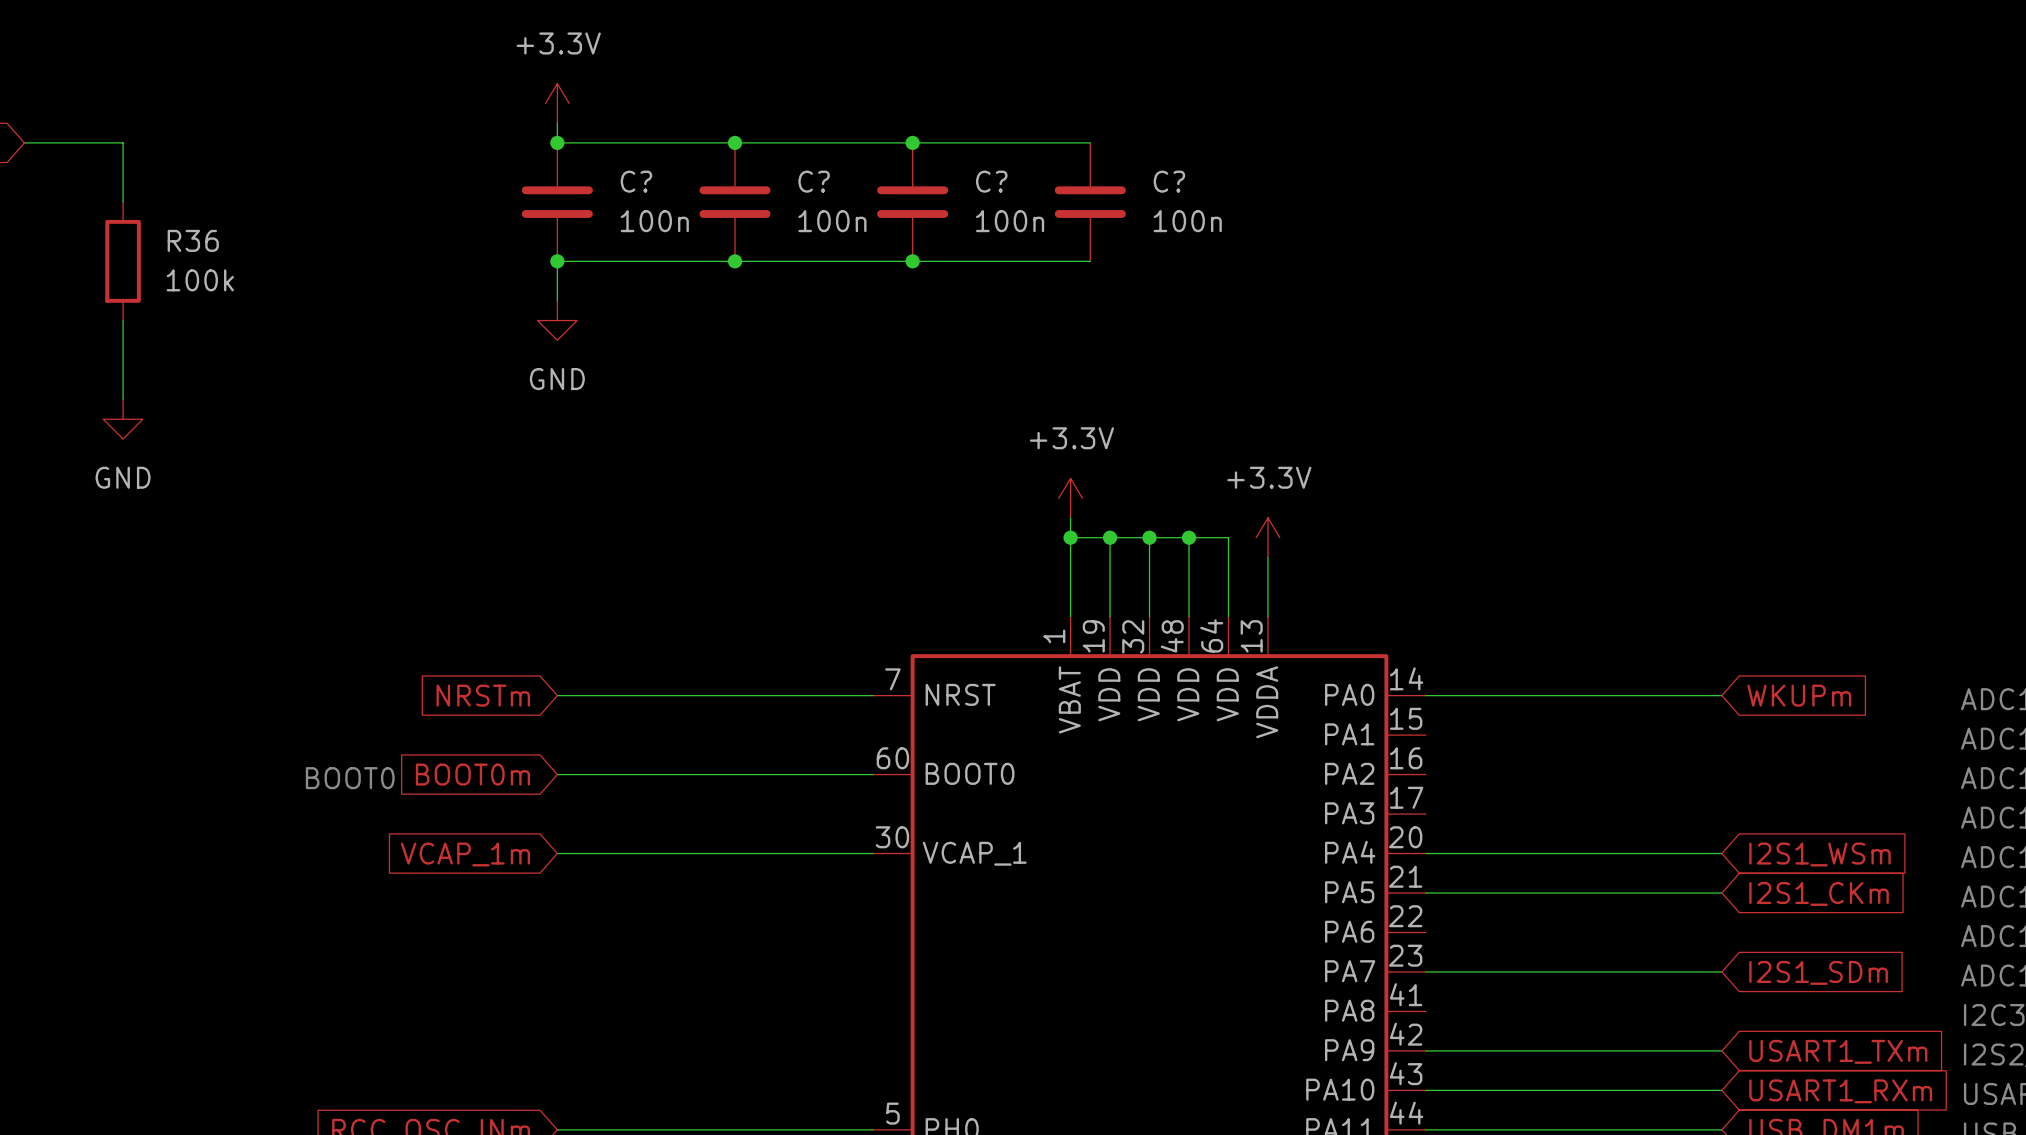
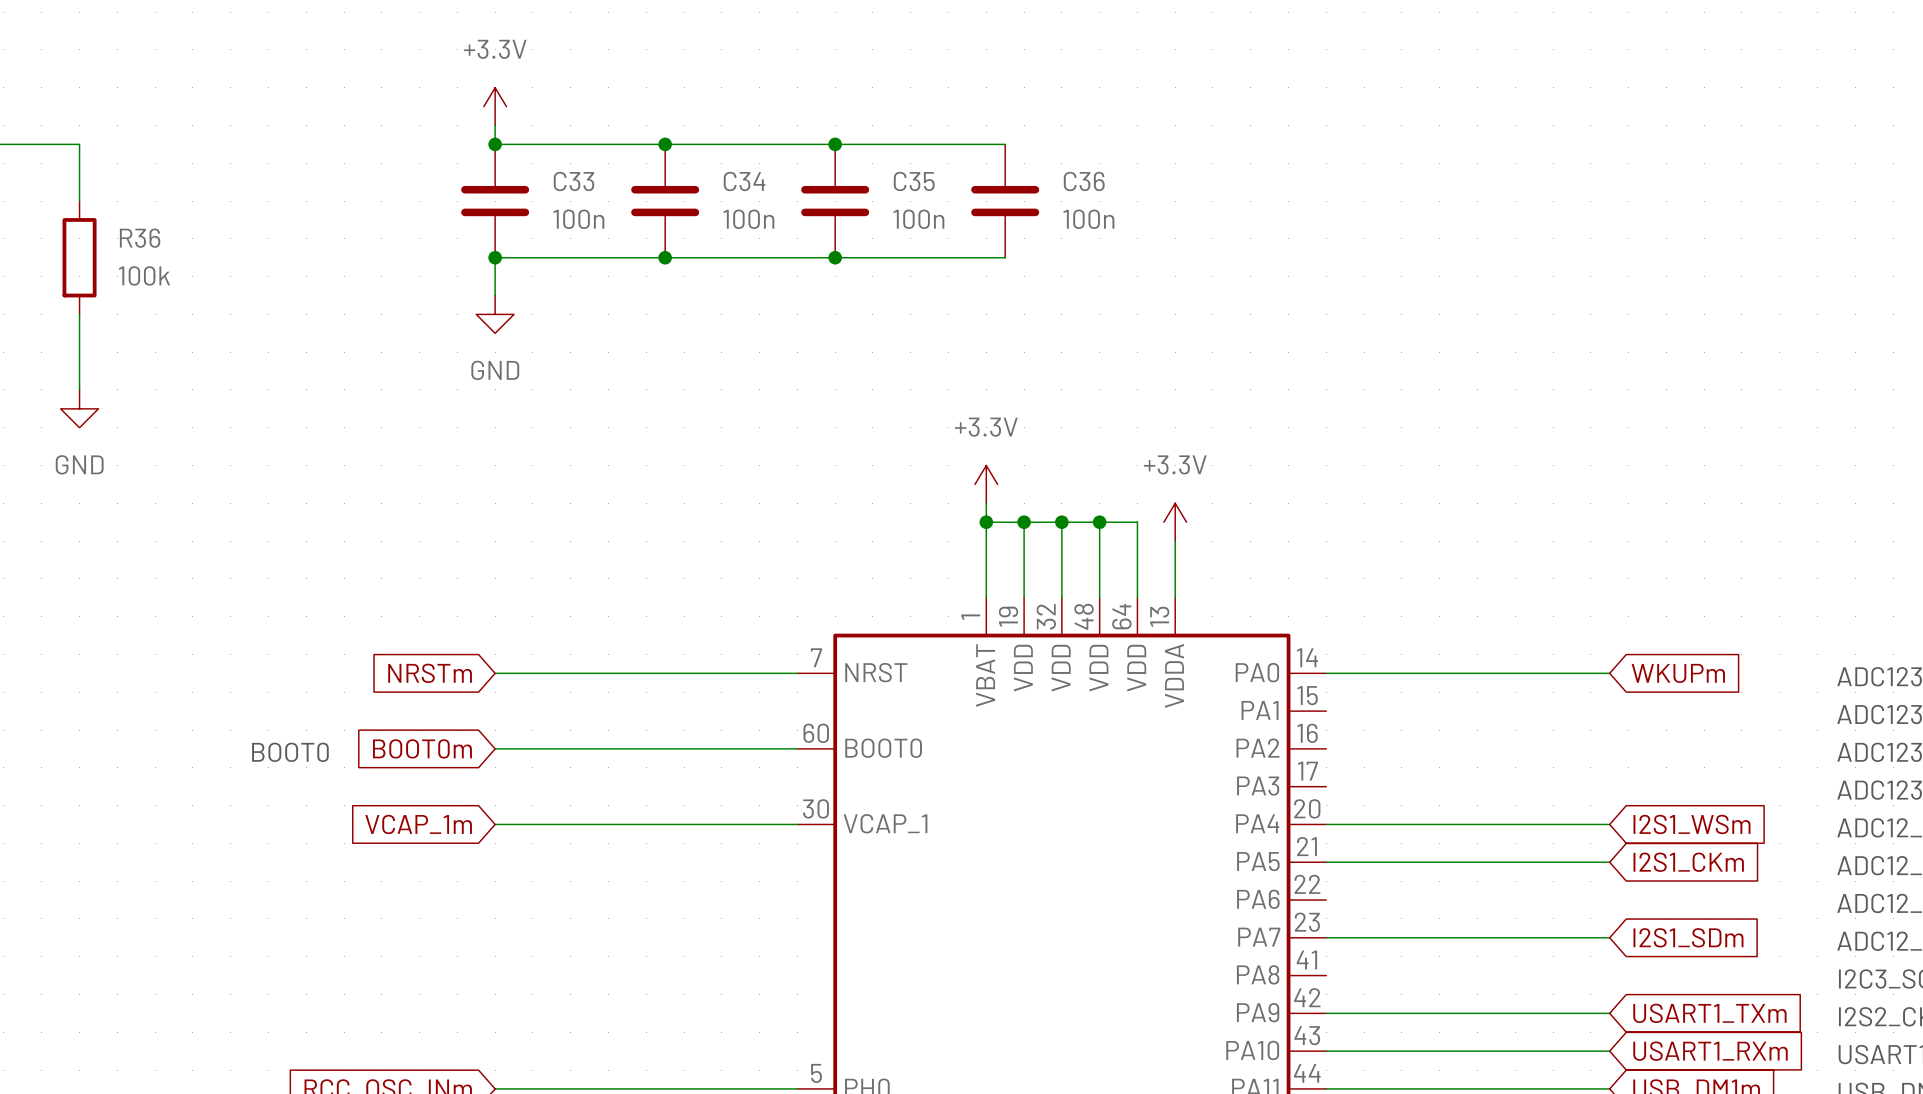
C? name: C? (636, 181) -> C33 (574, 181)
C? name: C? (814, 181) -> C34 (744, 181)
C? name: C? (991, 181) -> C35 (914, 181)
C? name: C? (1169, 181) -> C36 (1084, 181)

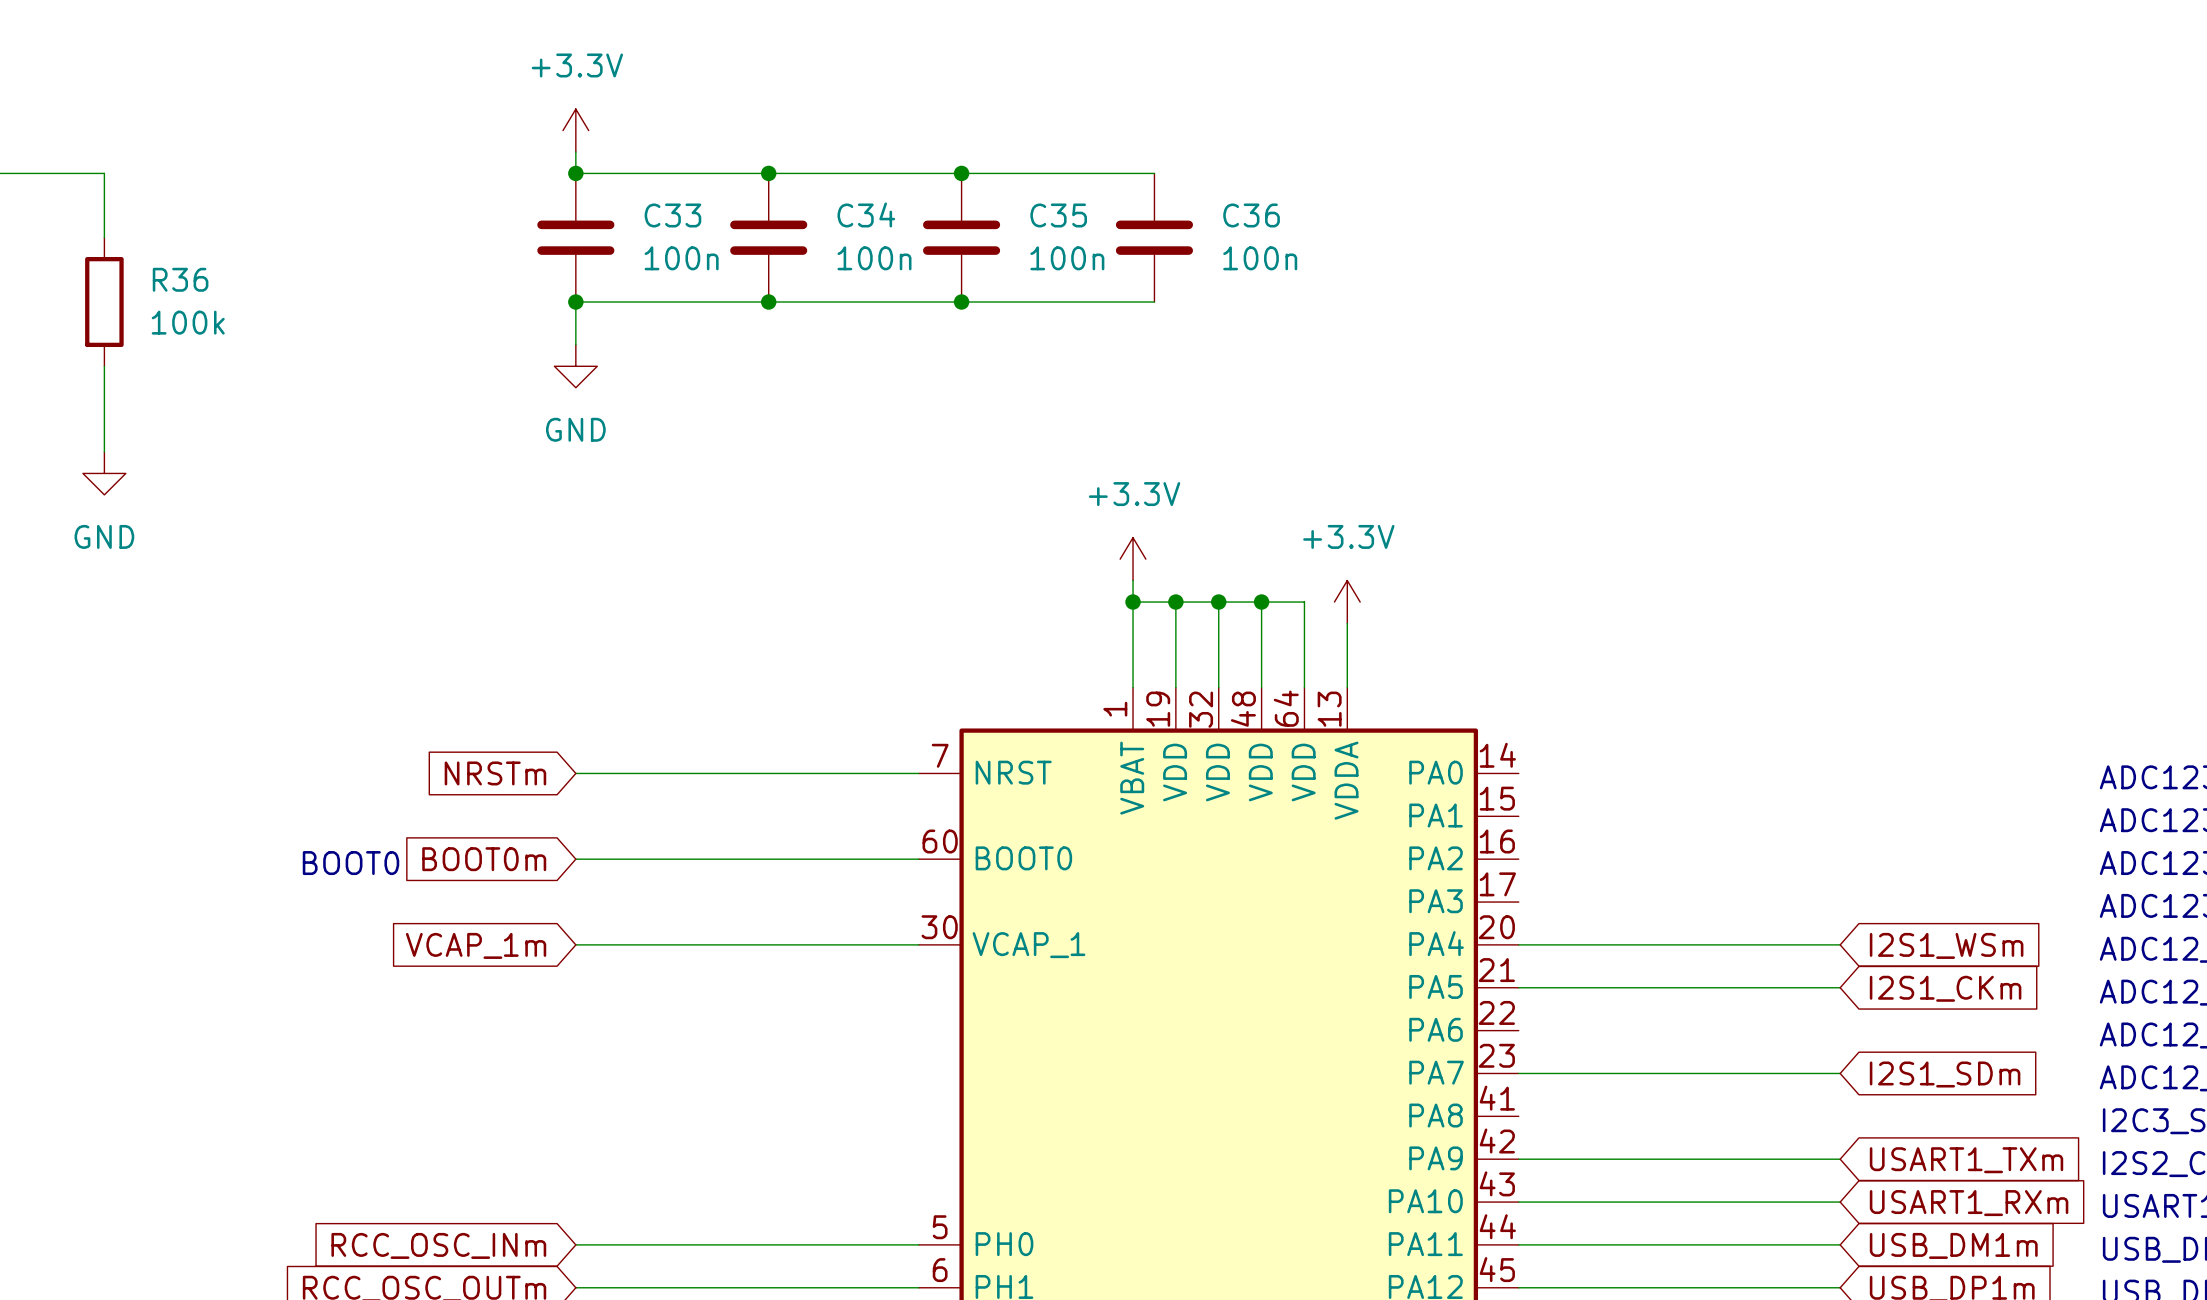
wire: (1326, 673) (1609, 673) -> none
global label: WKUPm (1678, 673) -> none

